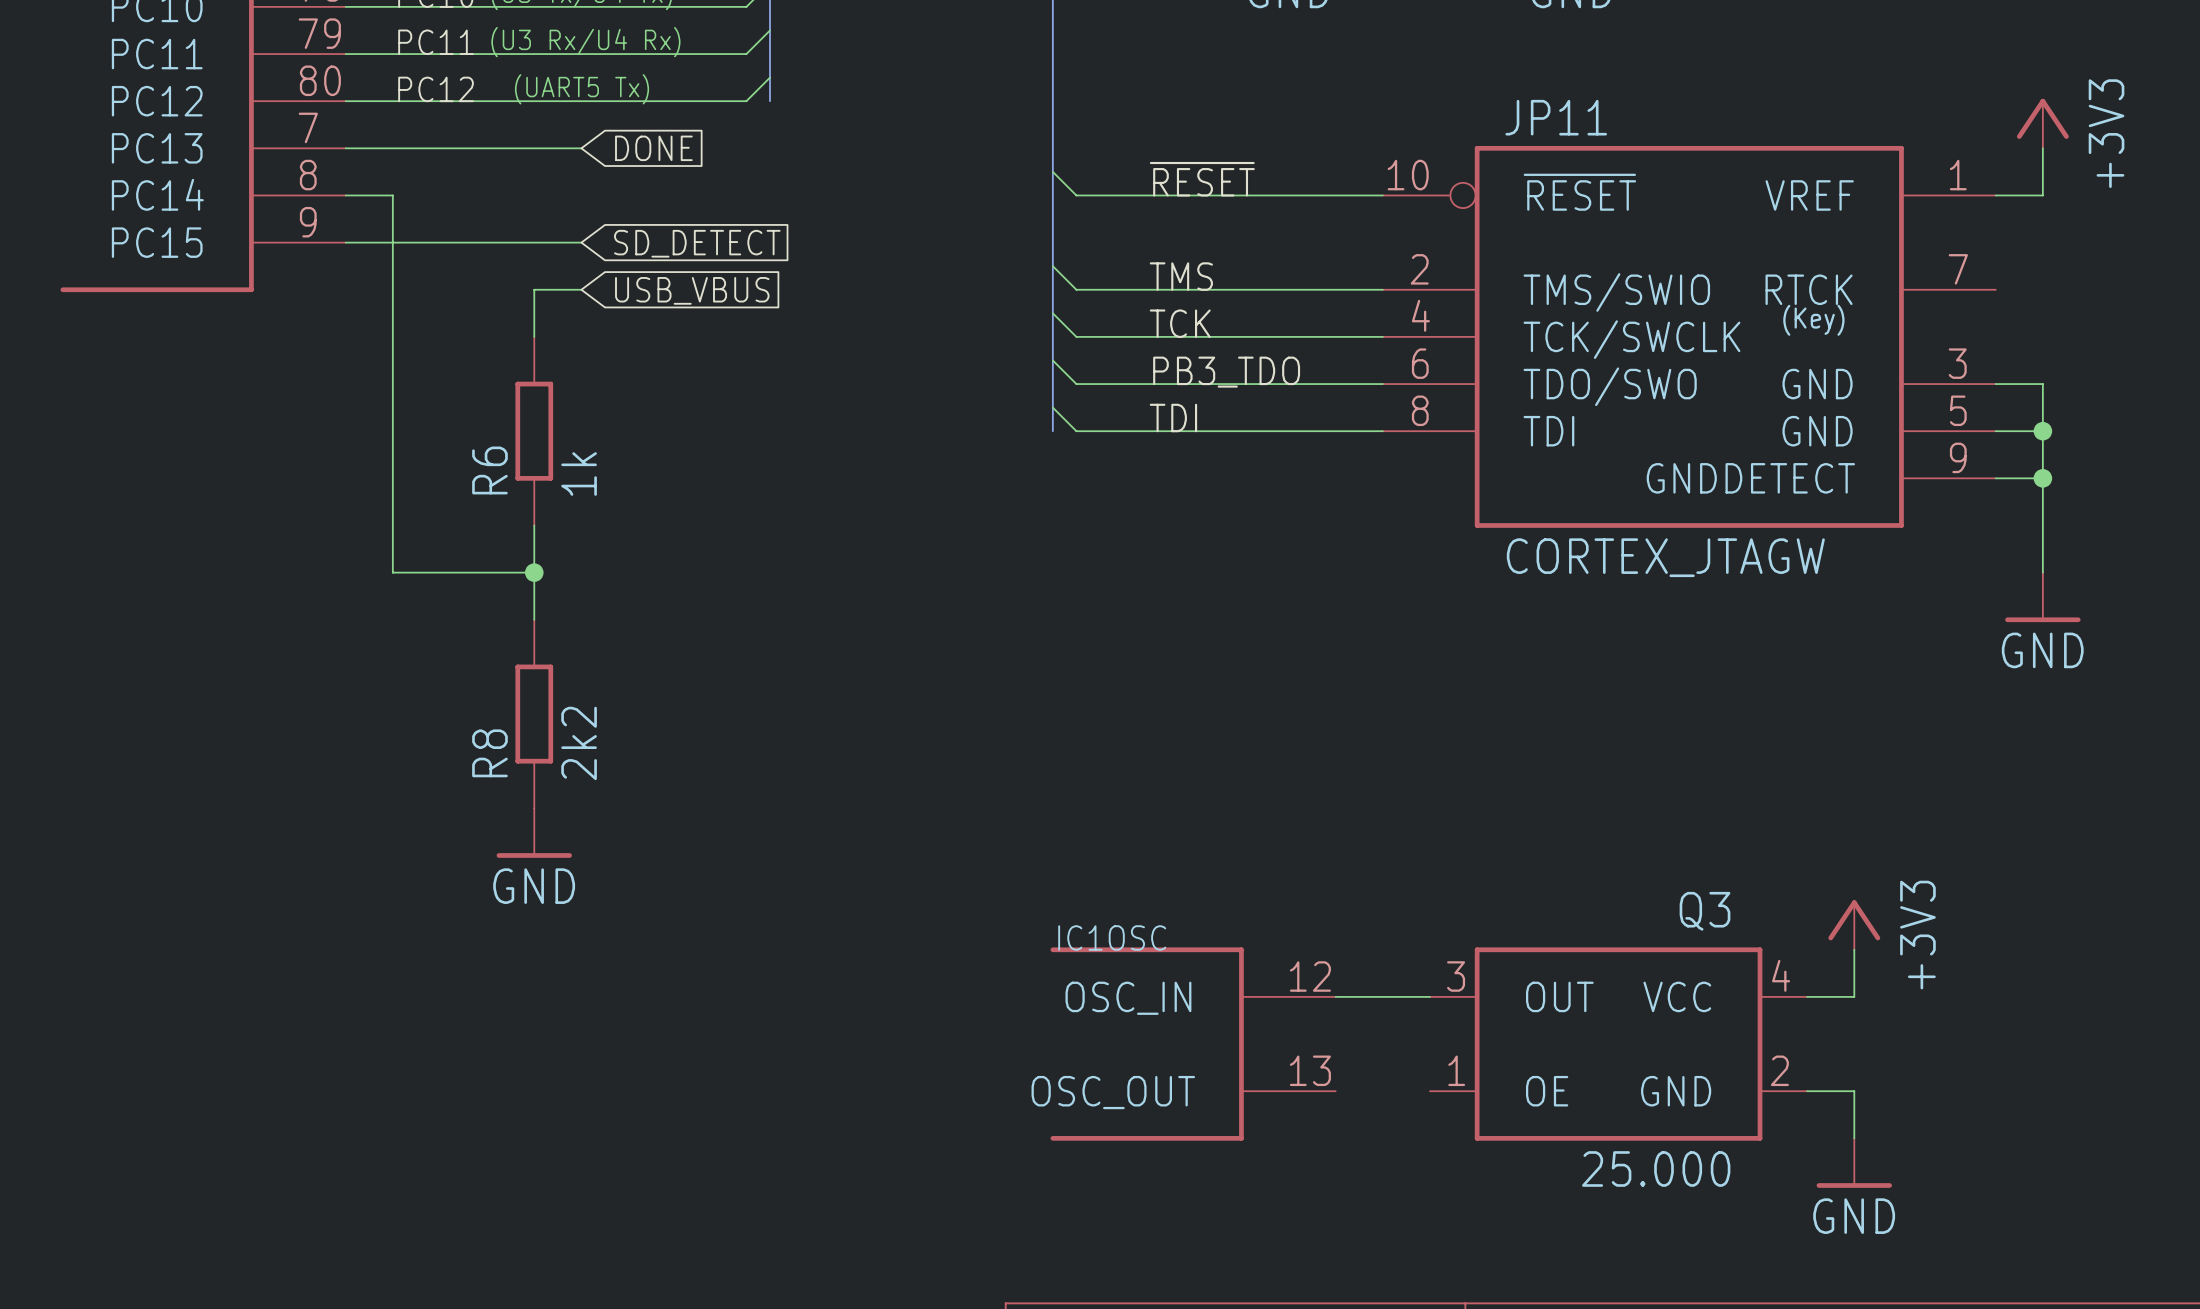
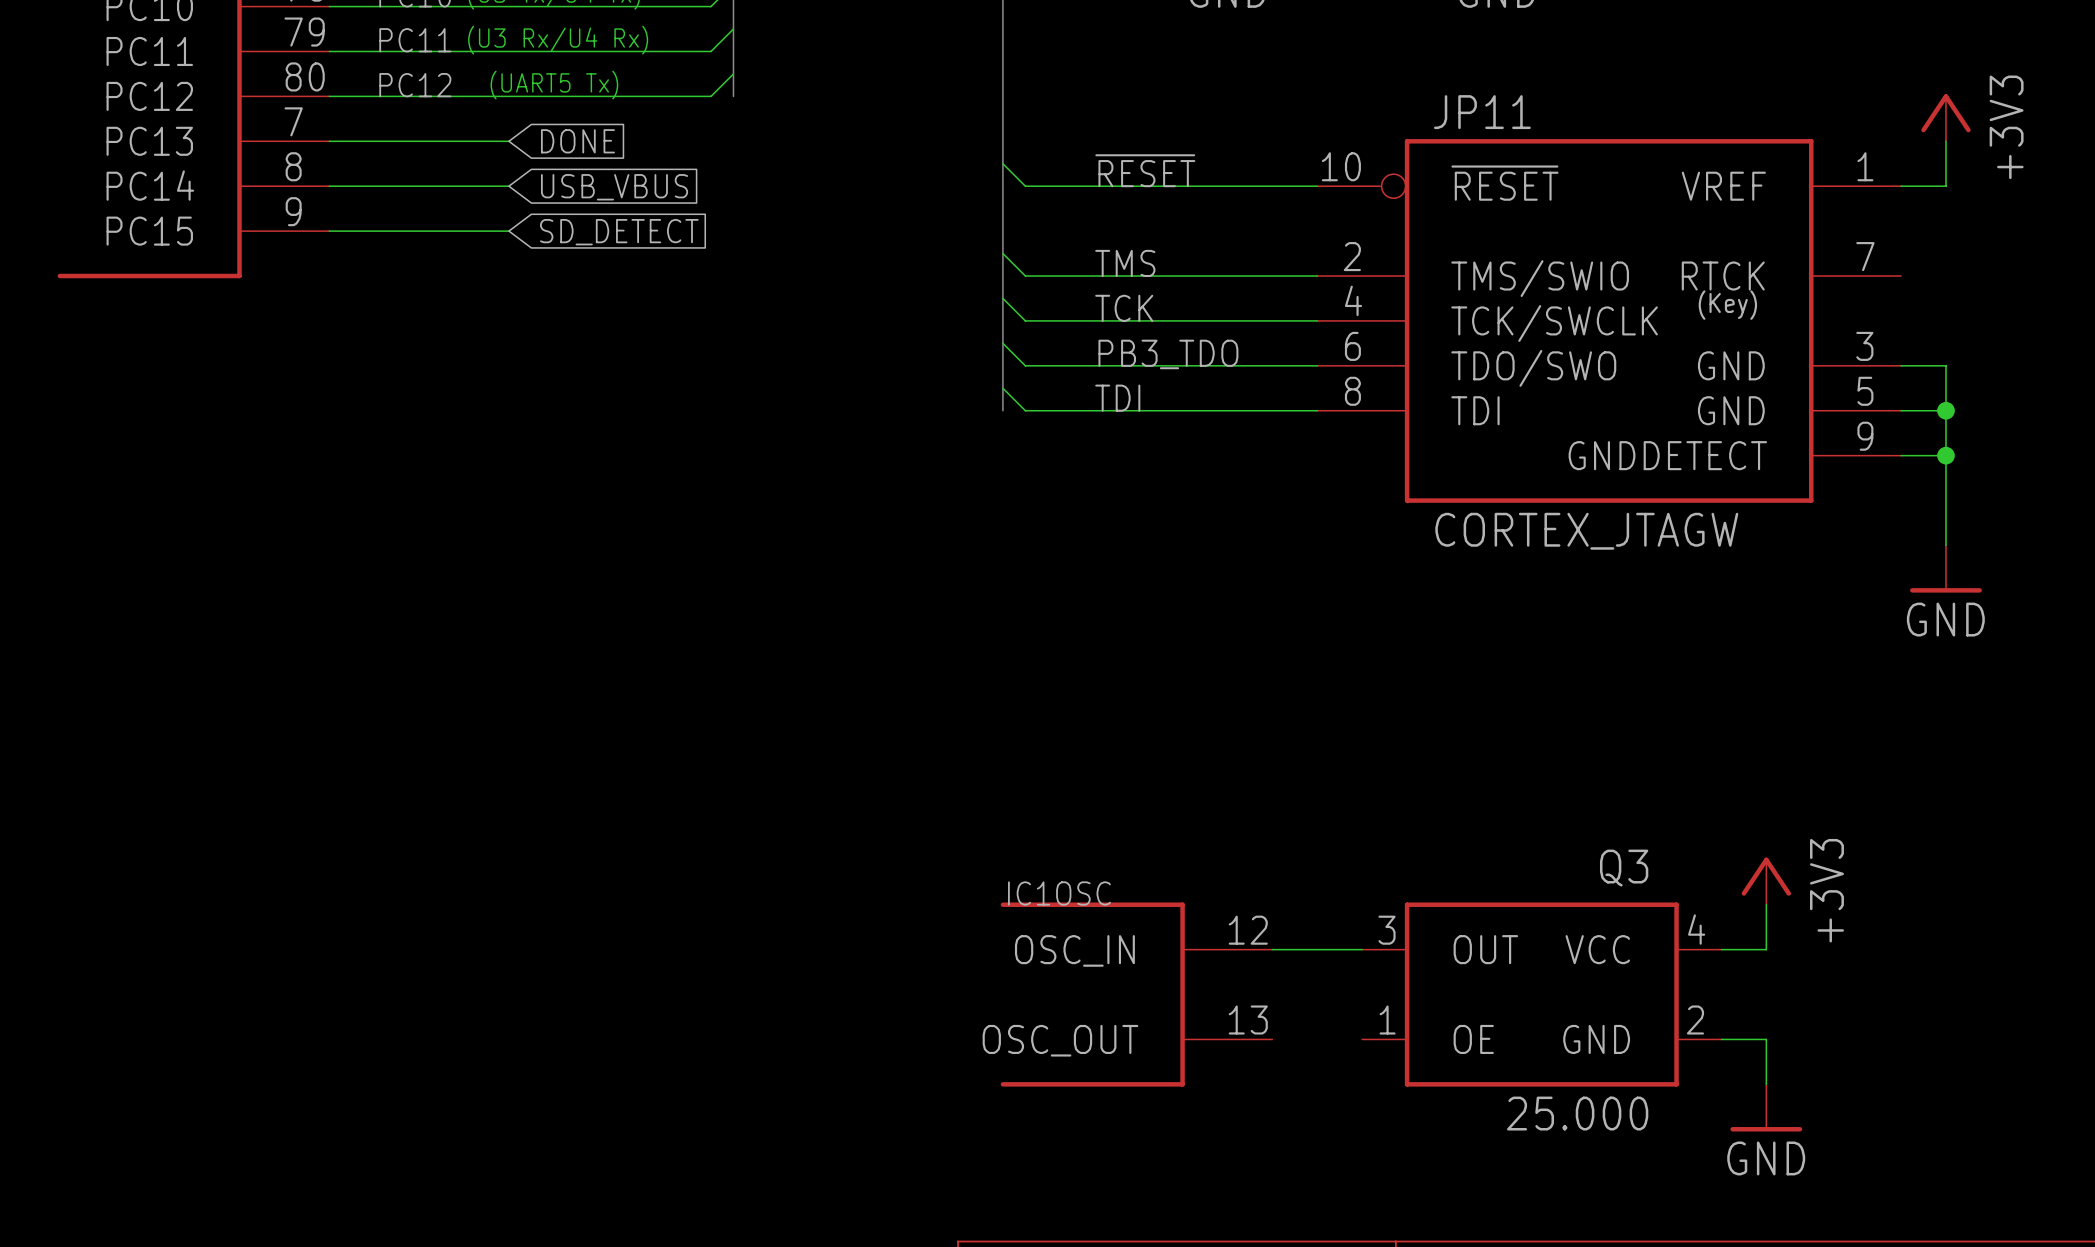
wire: (534, 148) (581, 148) -> none
global label position: DONE (653, 148) -> DONE (577, 141)
wire: (392, 195) (392, 572) (534, 572) -> (374, 186) (508, 186)
wire: (534, 242) (581, 242) -> none
global label position: SD_DETECT (697, 243) -> SD_DETECT (619, 232)
wire: (581, 289) (534, 289) (534, 336) -> none
global label position: USB_VBUS (692, 290) -> USB_VBUS (614, 187)
R6: 1k (534, 431) -> none
wire: (534, 525) (534, 619) -> none
junction: (534, 572) -> none
R8: 2k2 (534, 714) -> none
power symbol: GND (534, 833) -> none

